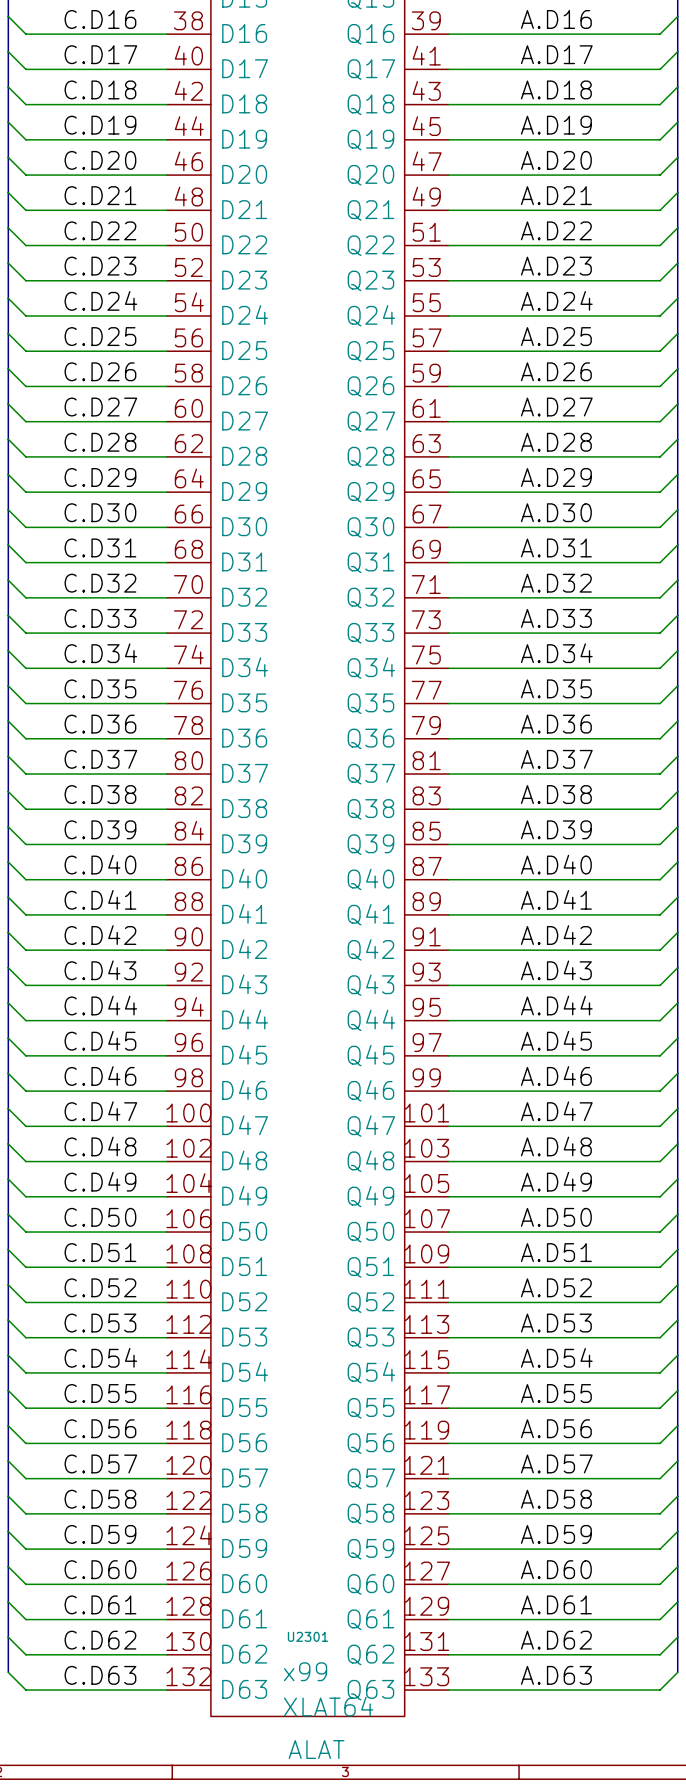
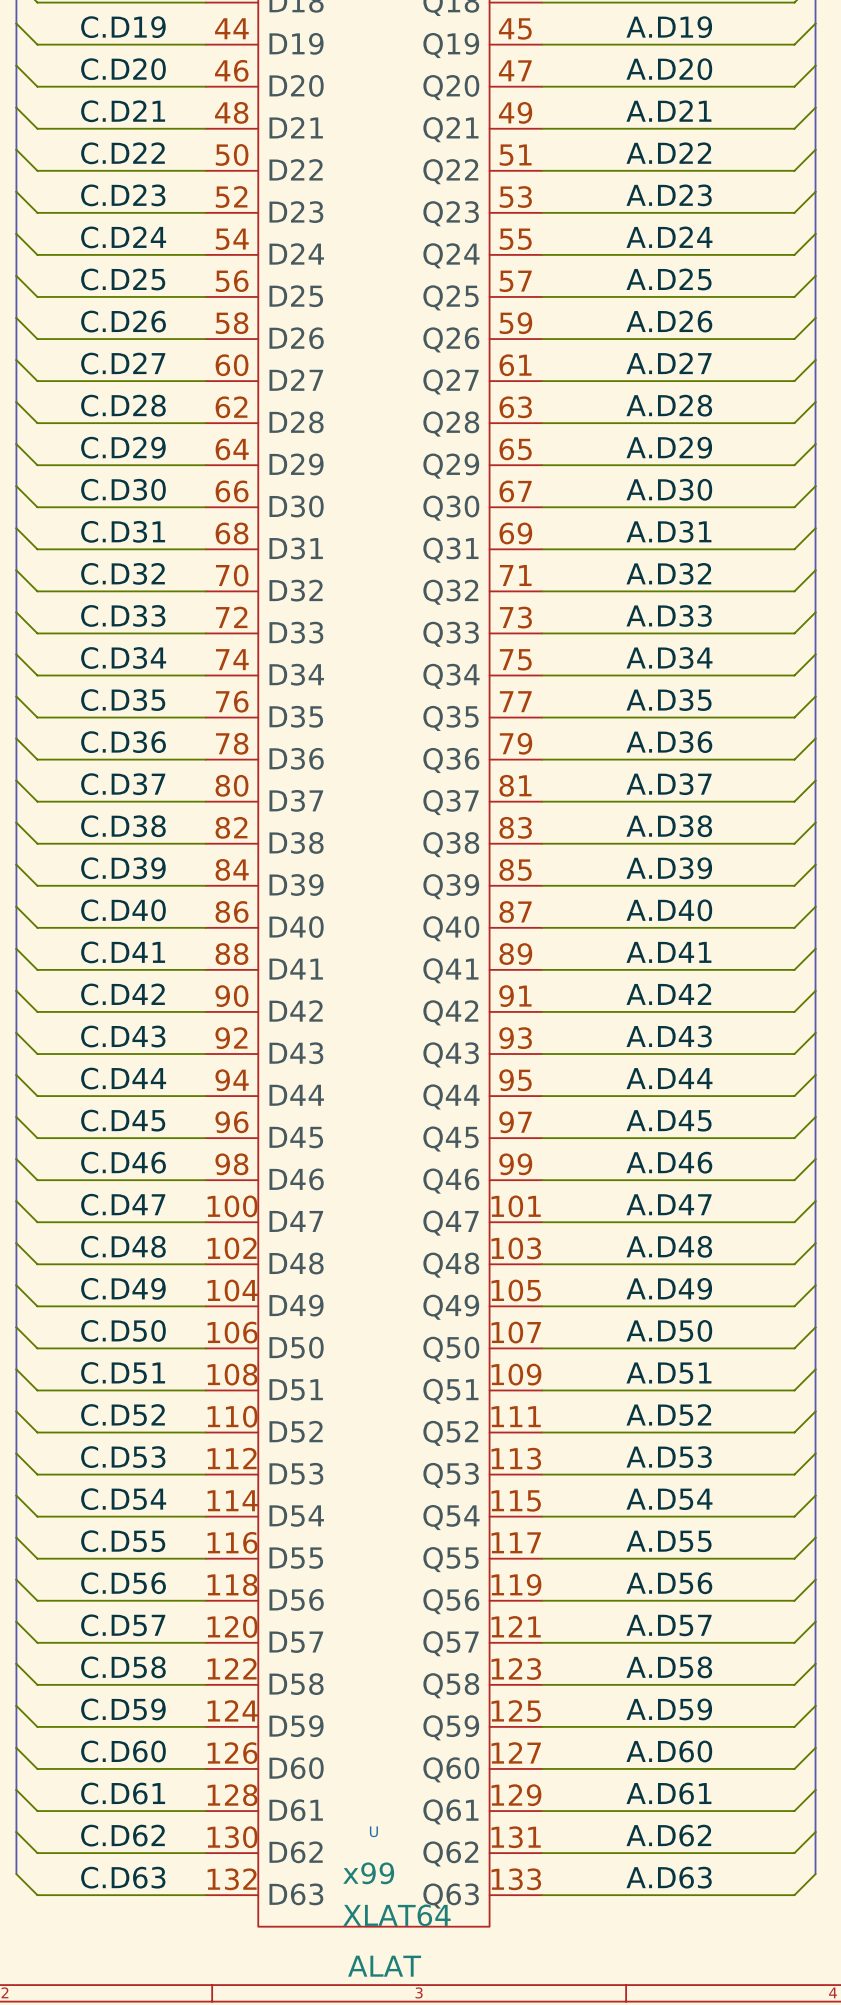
U2301 name: U2301 (308, 1636) -> U (373, 1831)

